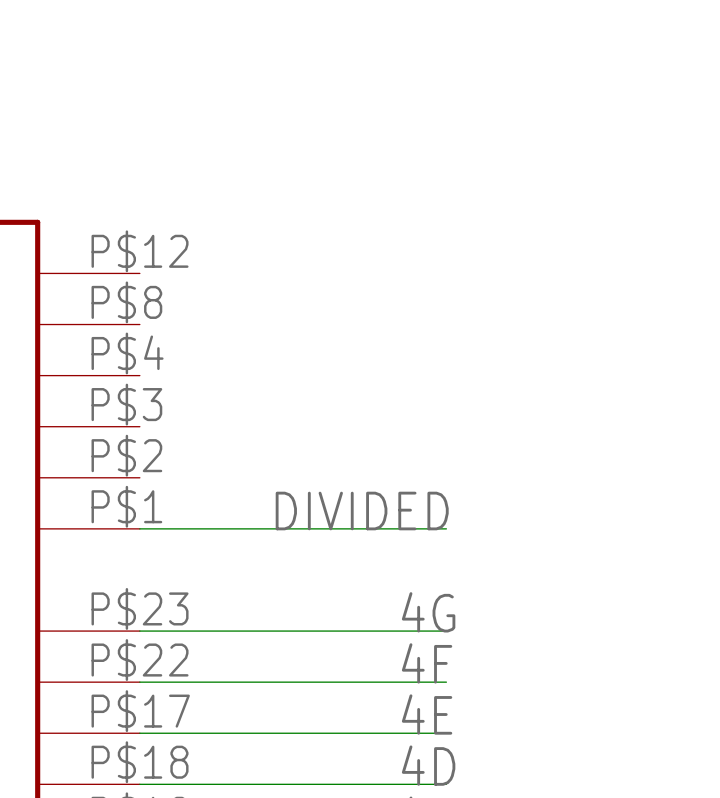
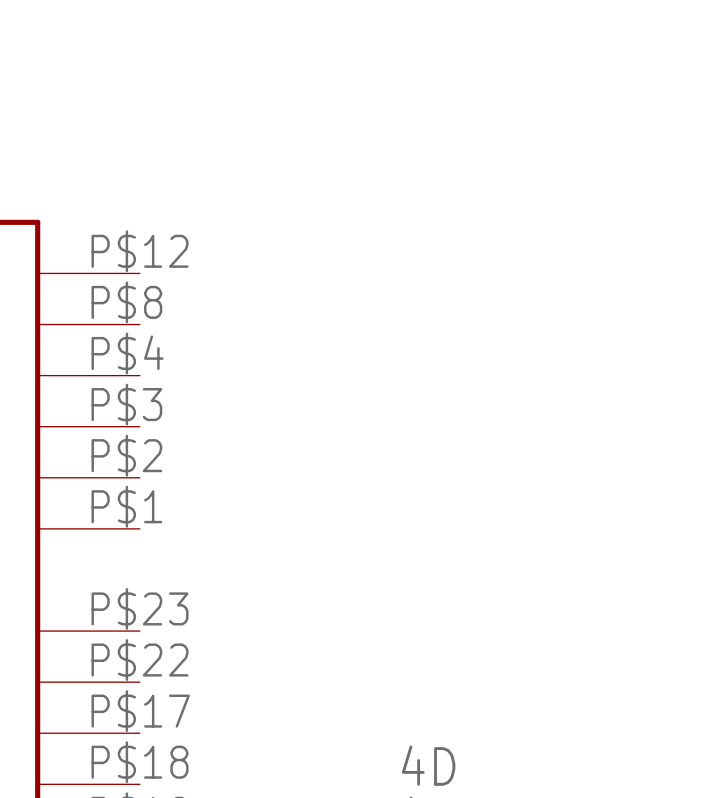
label: DIVIDED (362, 511) -> none
wire: (139, 528) (446, 528) -> none
label: 4G (428, 612) -> none
wire: (139, 631) (446, 631) -> none
label: 4F (427, 663) -> none
wire: (139, 682) (446, 682) -> none
label: 4E (427, 714) -> none
wire: (139, 733) (446, 733) -> none
wire: (139, 784) (446, 784) -> none

